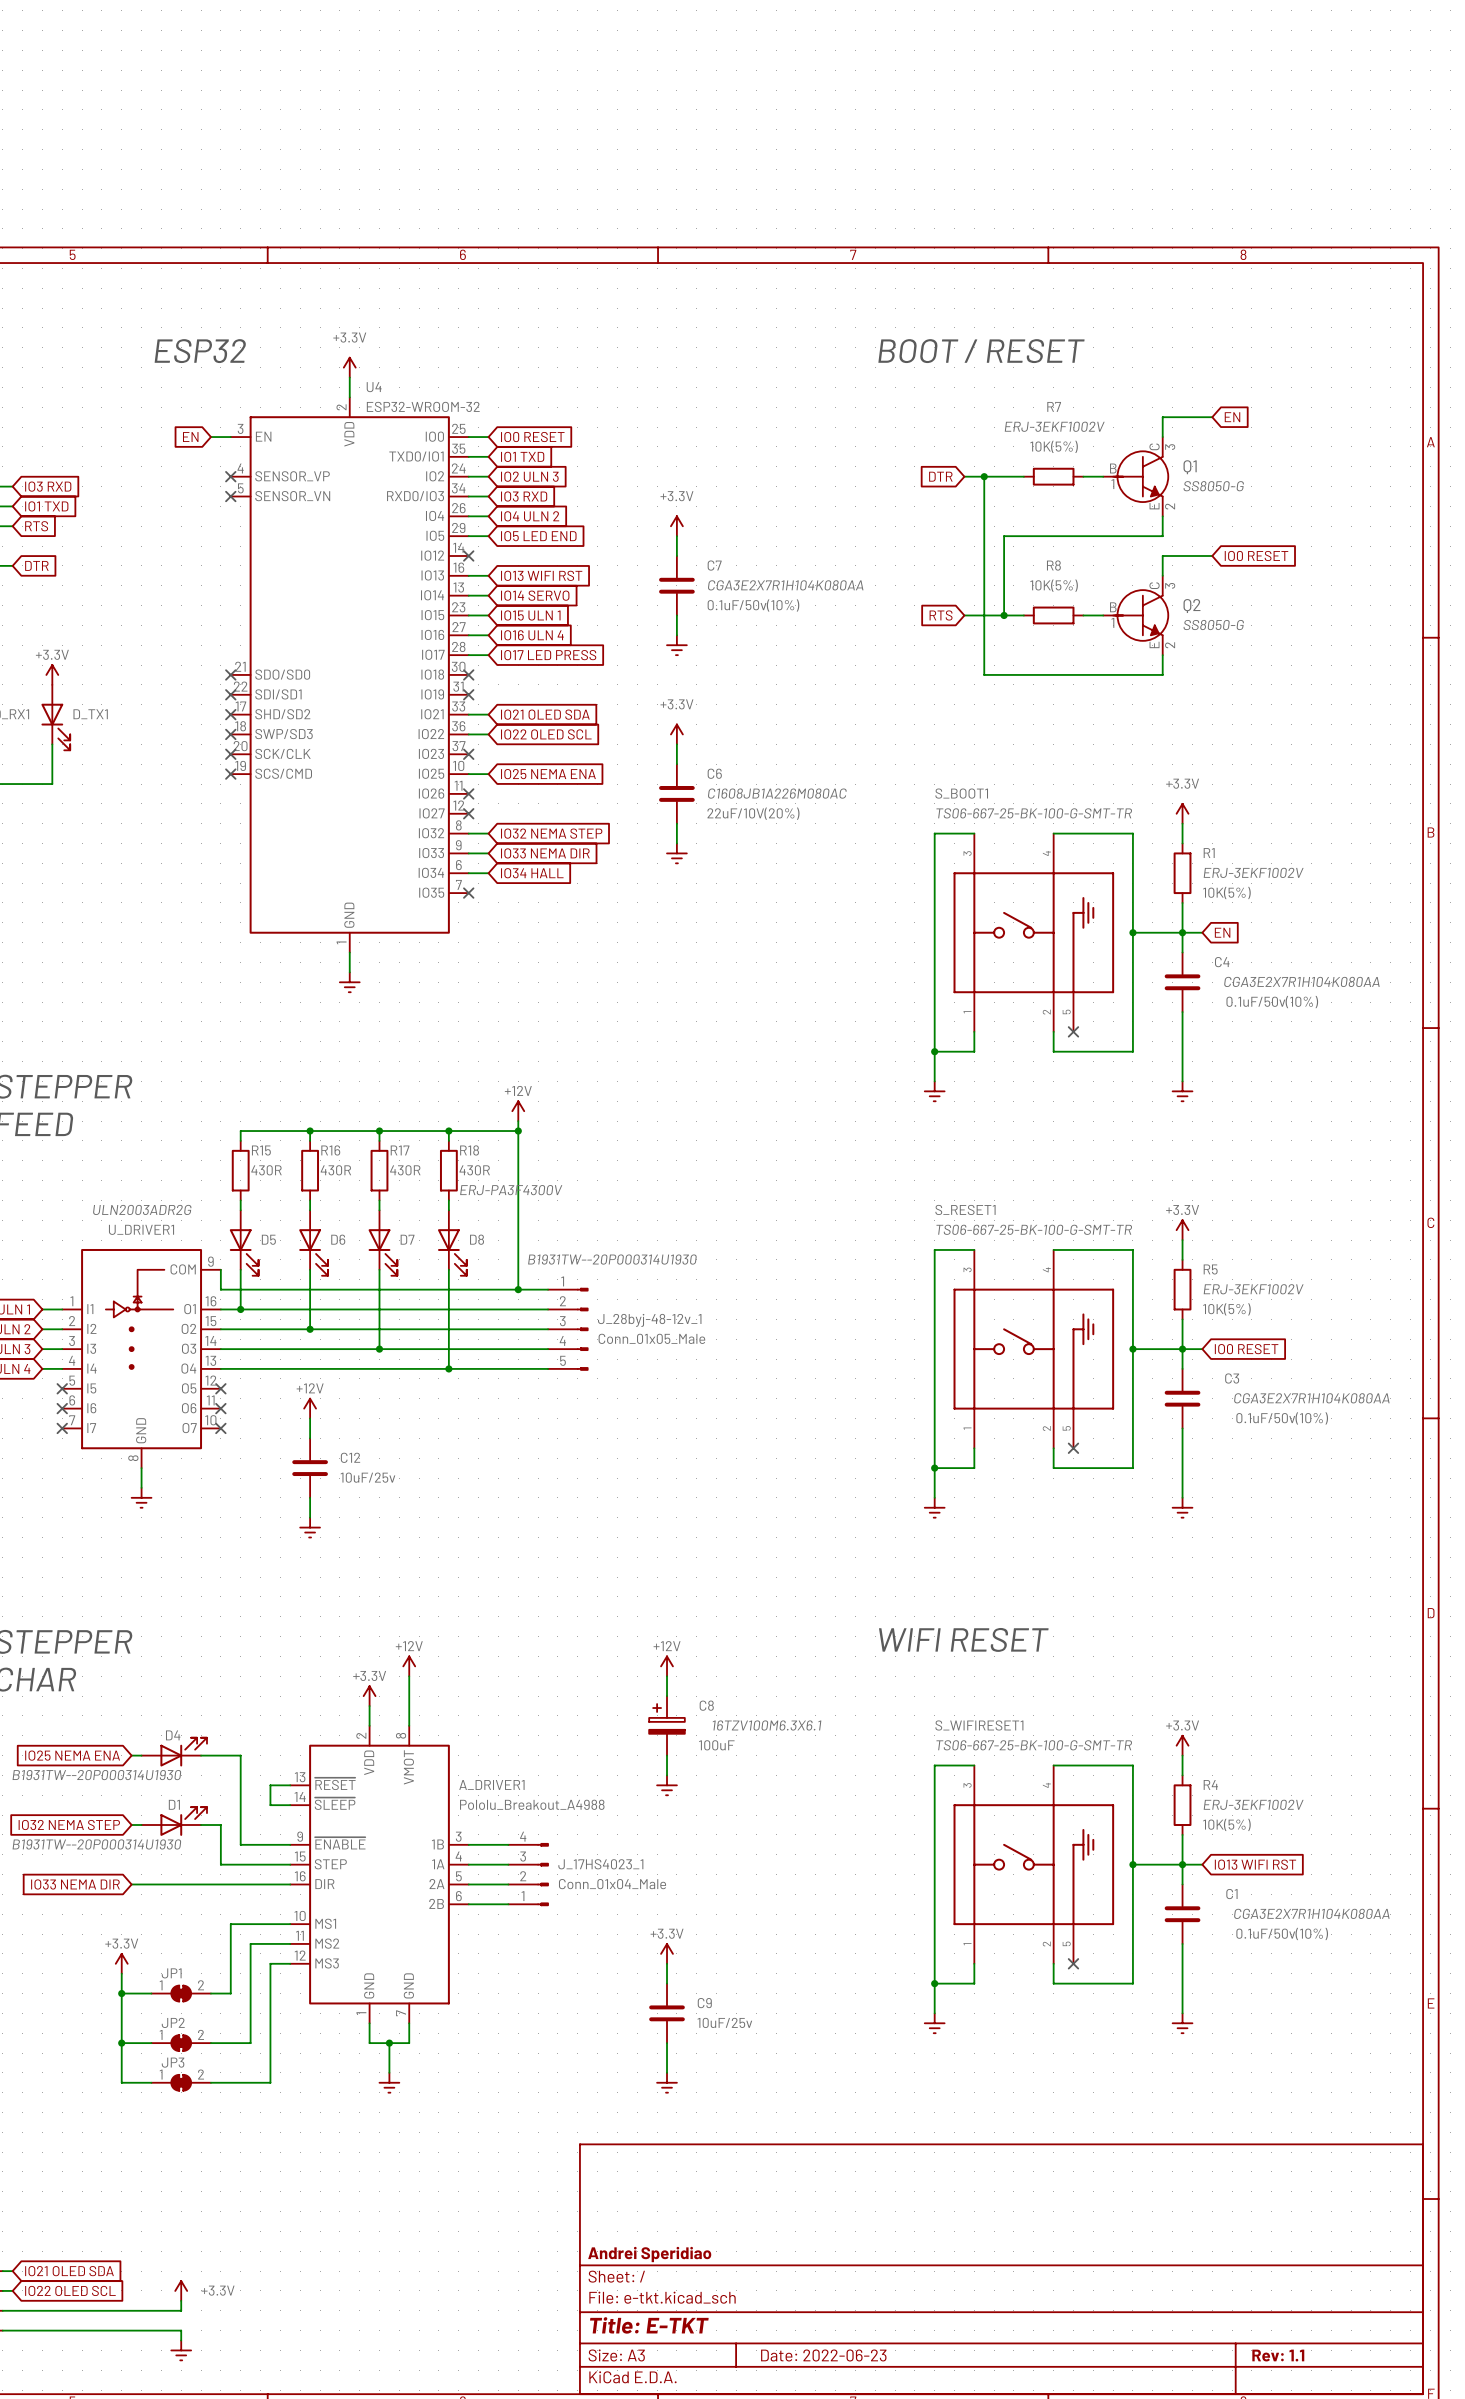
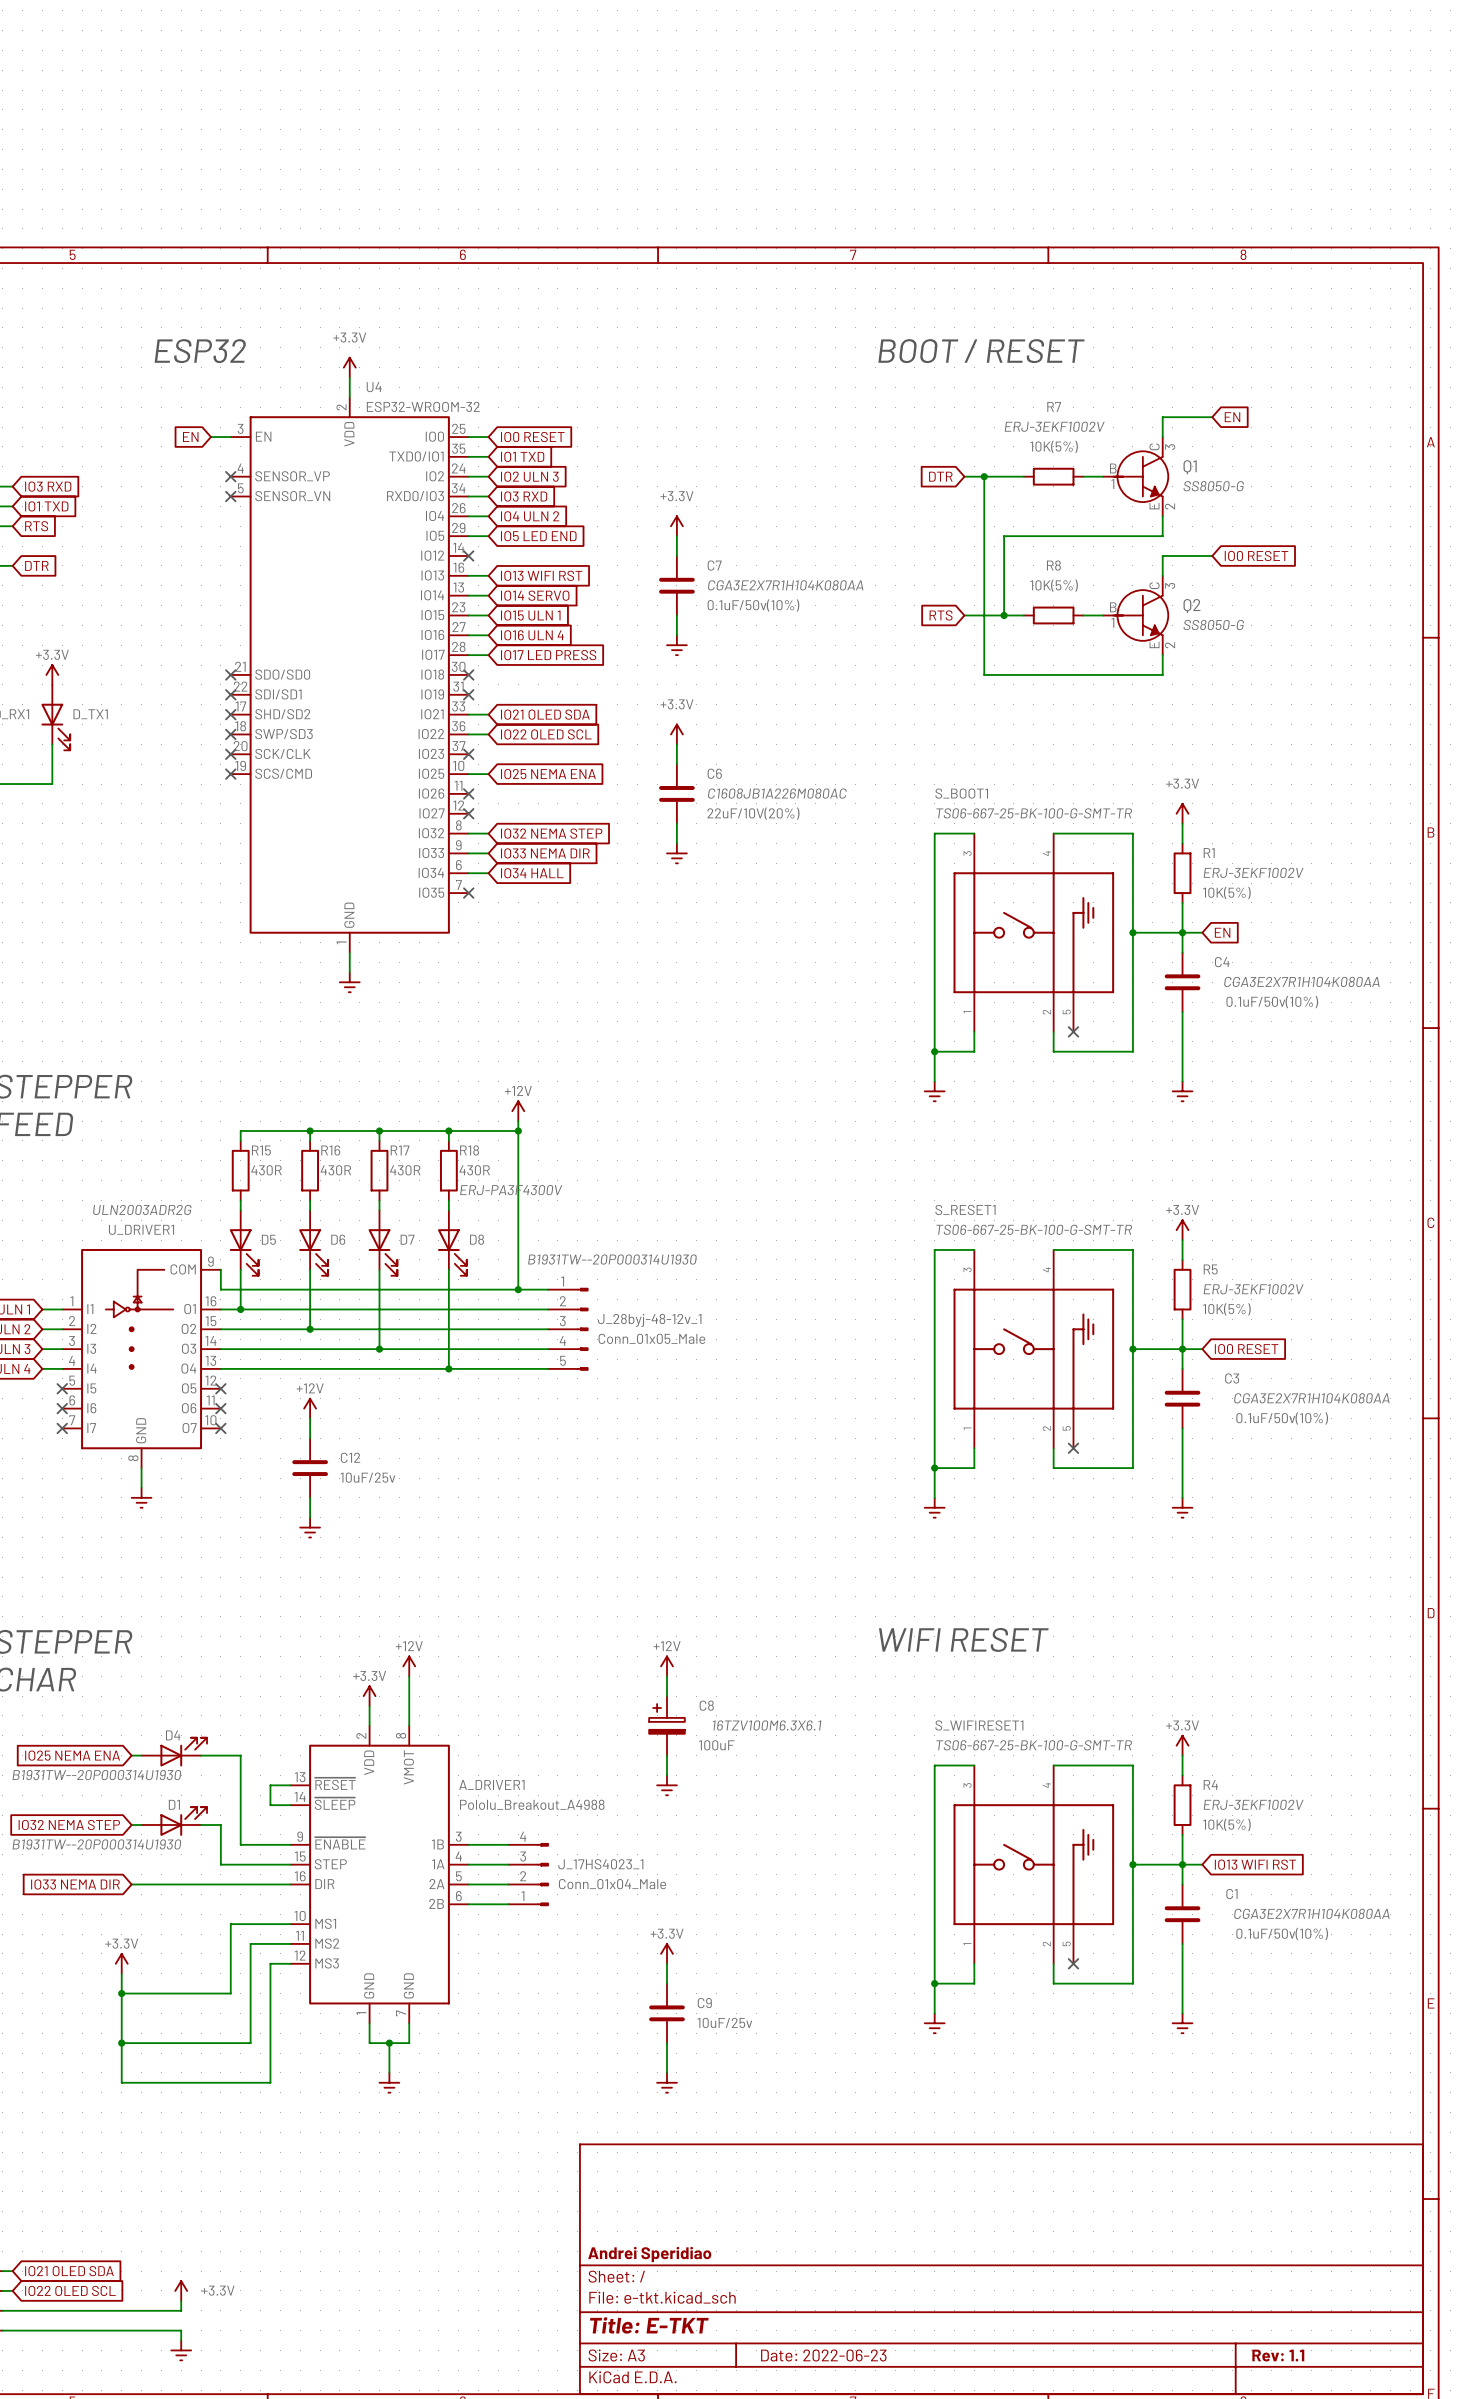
JP1: (181, 1993) -> none
JP2: (181, 2043) -> none
JP3: (181, 2082) -> none

